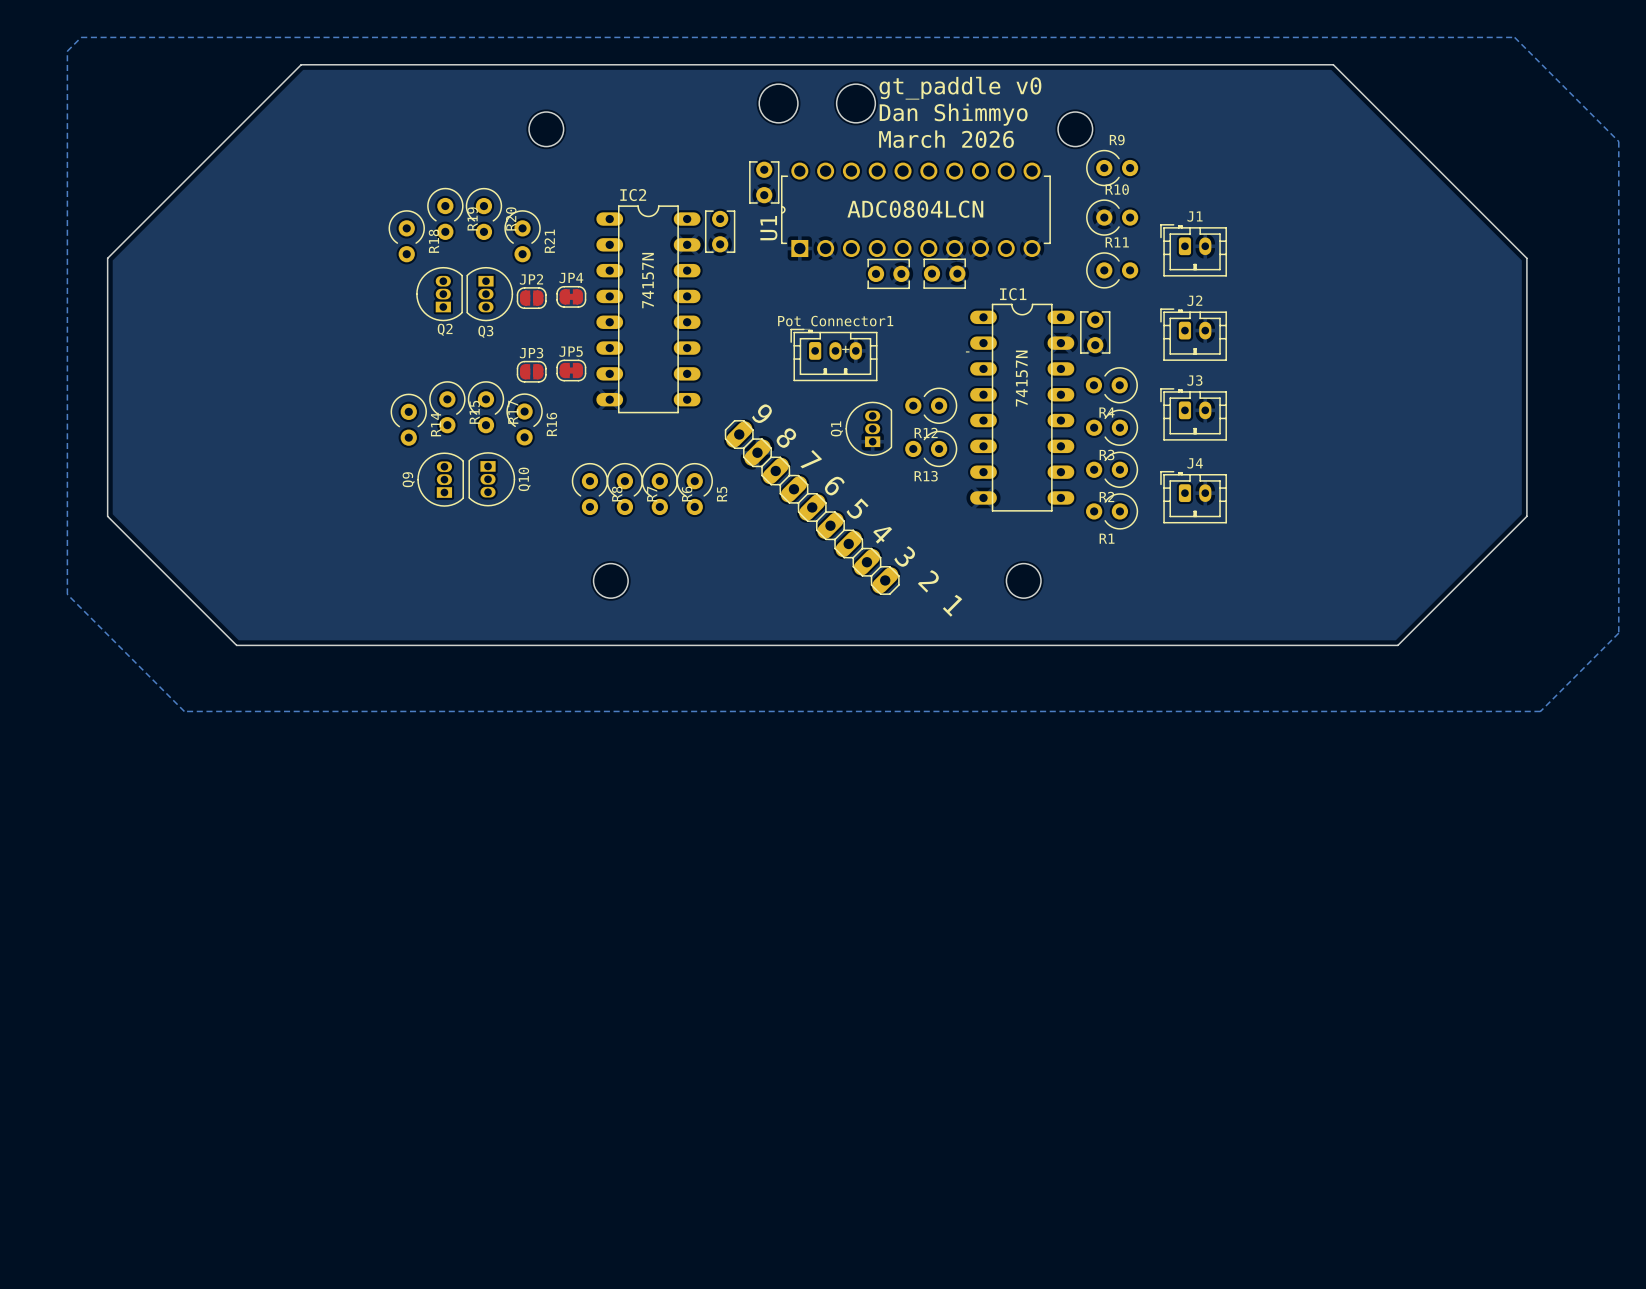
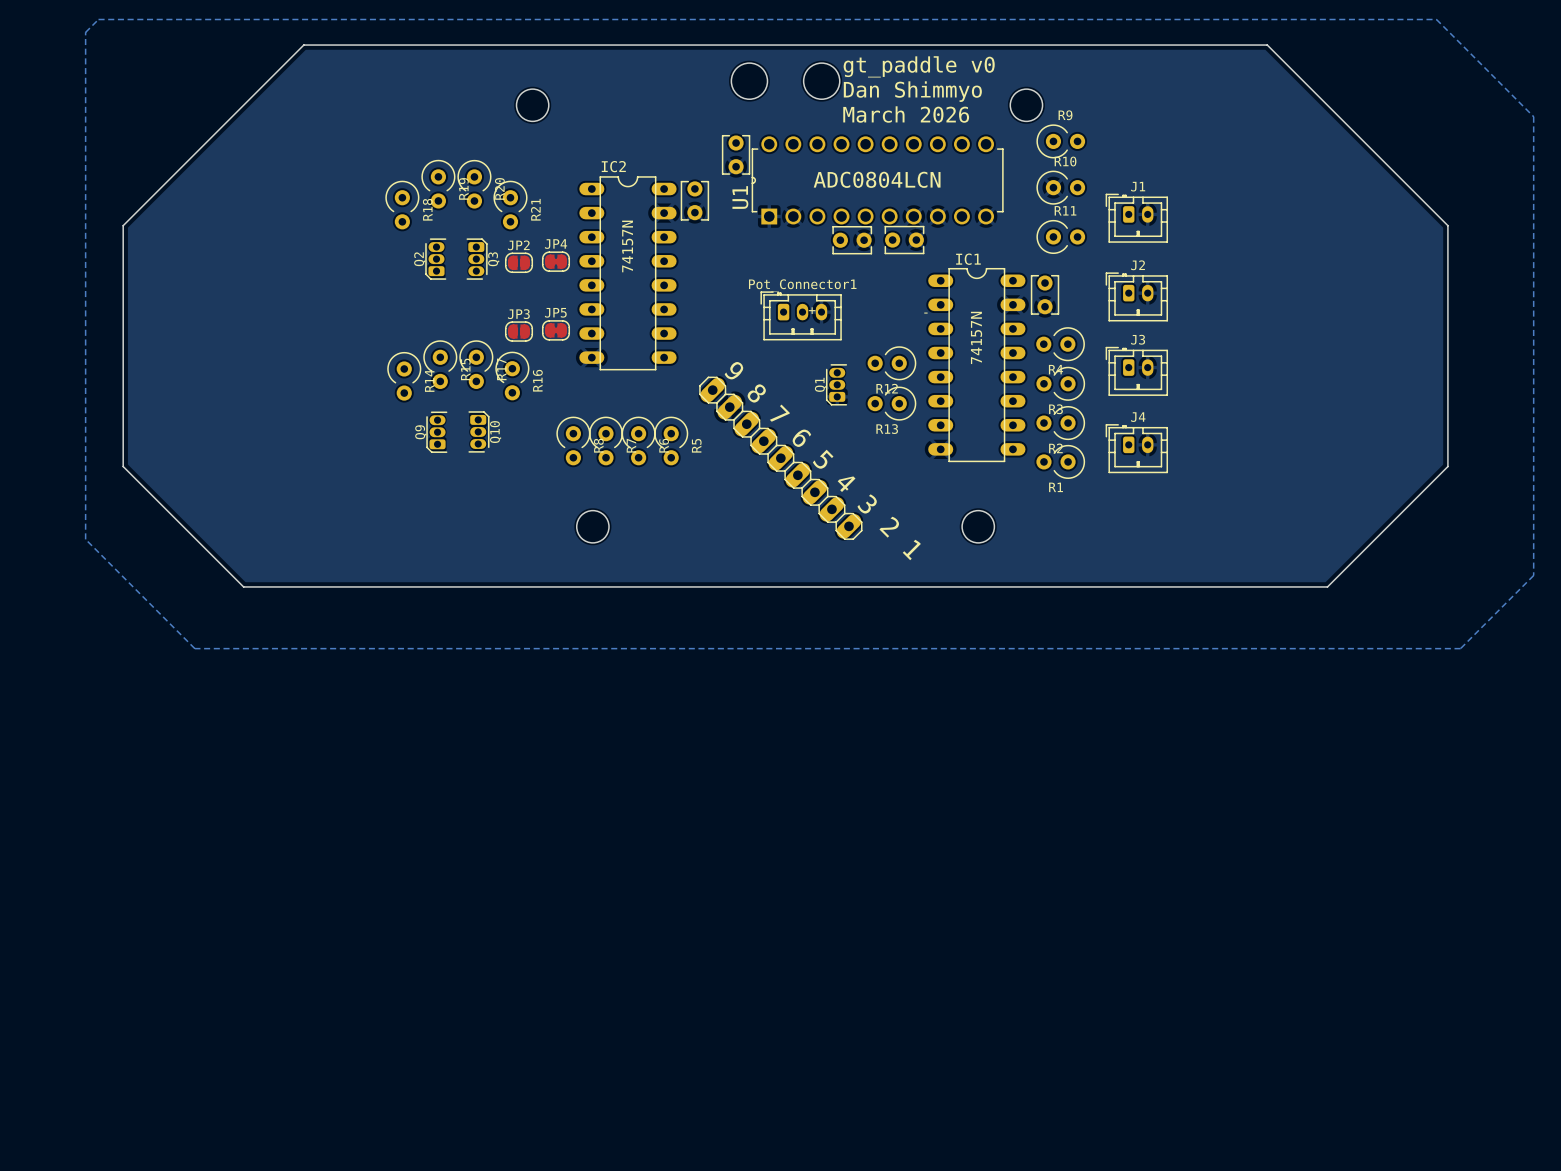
Q2 footprint: [416, 267, 463, 322] -> [425, 238, 447, 280]
Q3 footprint: [466, 267, 514, 322] -> [466, 238, 488, 280]
Q2 name position: Q2 (445, 329) -> Q2 (419, 259)
Q3 name position: Q3 (485, 331) -> Q3 (493, 259)
Q1 footprint: [845, 401, 893, 456] -> [826, 364, 847, 406]
Q9 footprint: [417, 452, 464, 507] -> [426, 411, 448, 453]
Q10 footprint: [468, 452, 516, 507] -> [468, 411, 490, 453]

